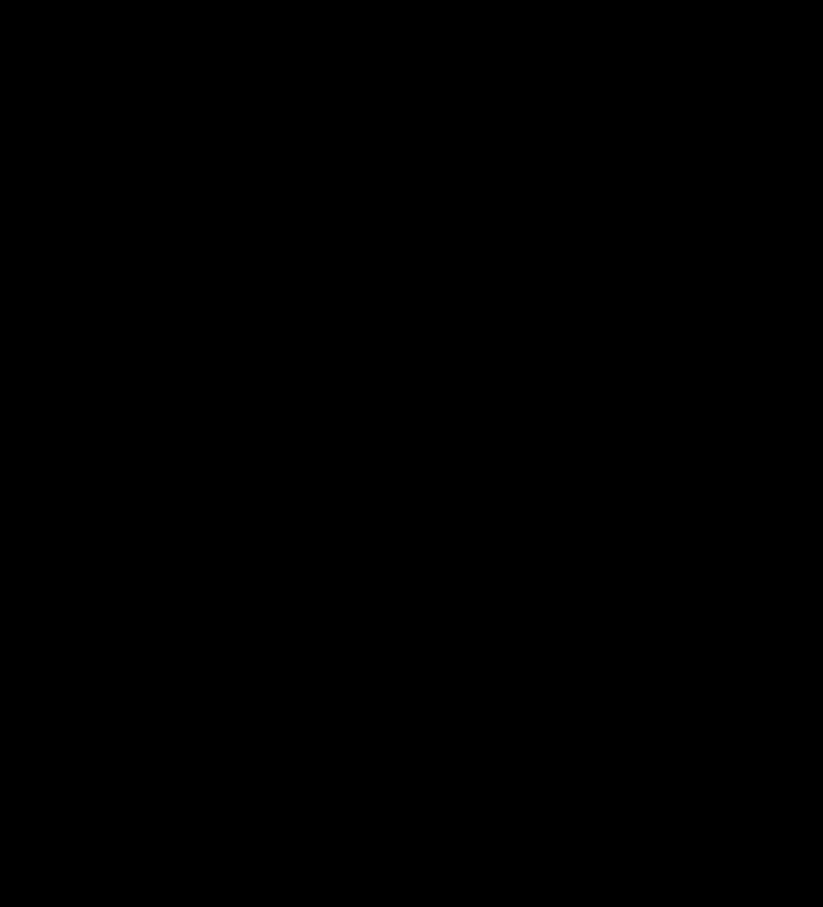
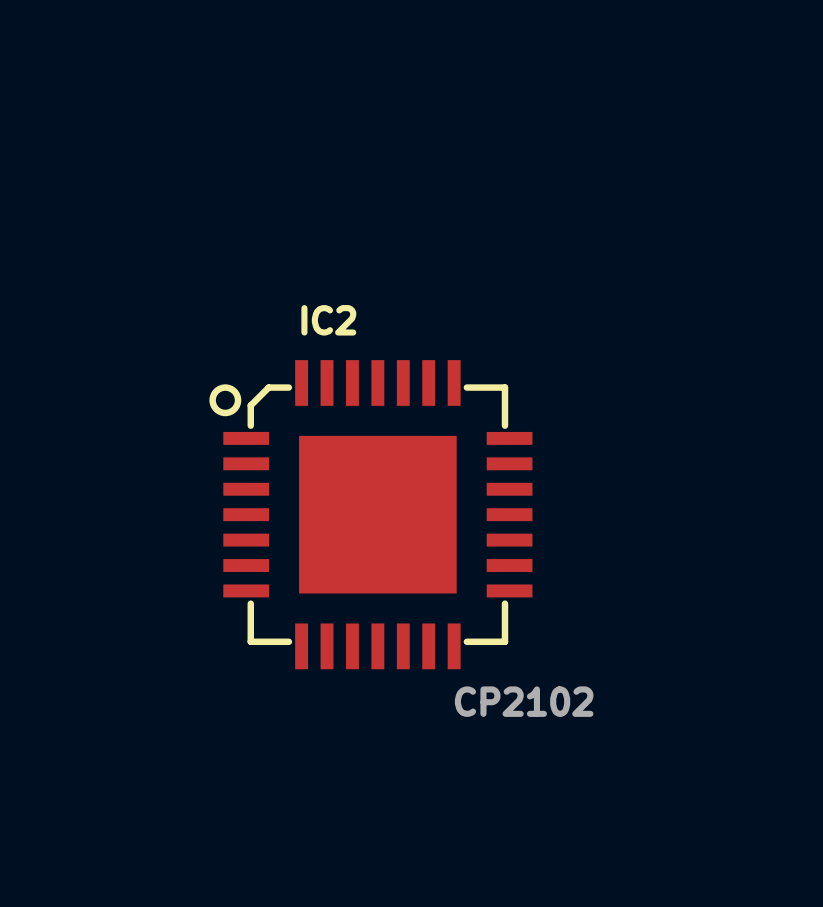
IC2: none -> CP2102 (370, 514)

